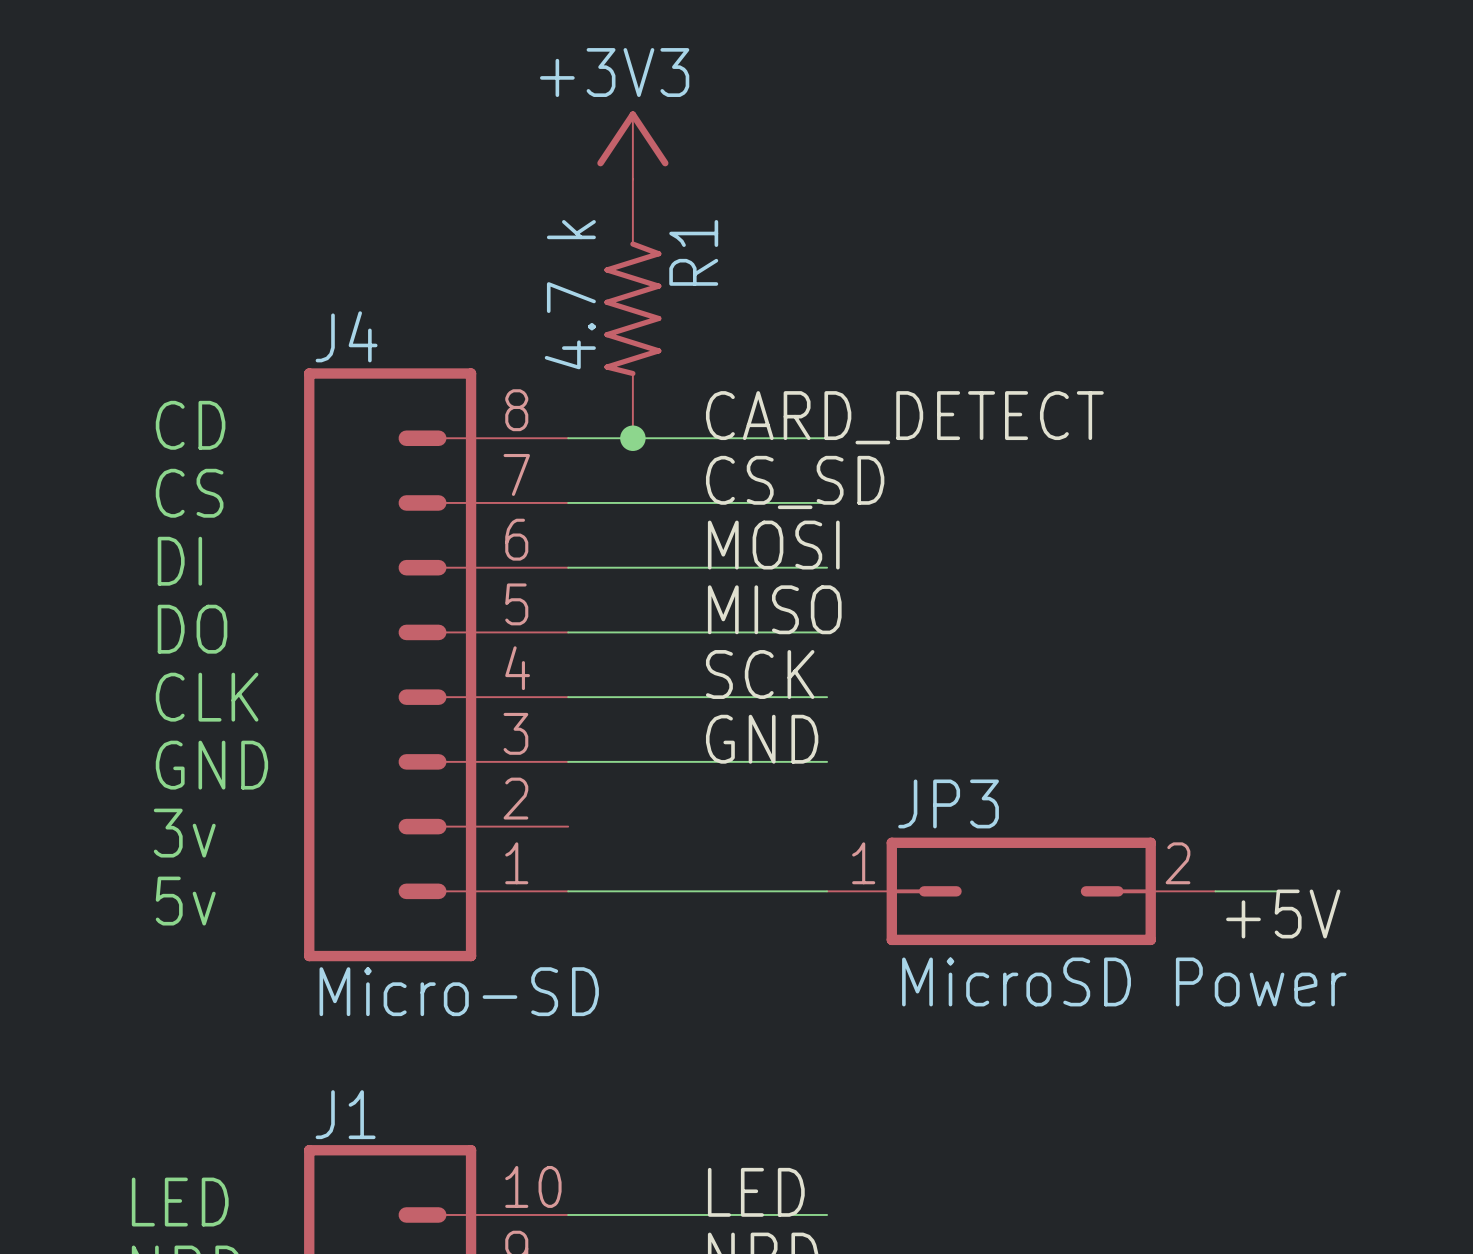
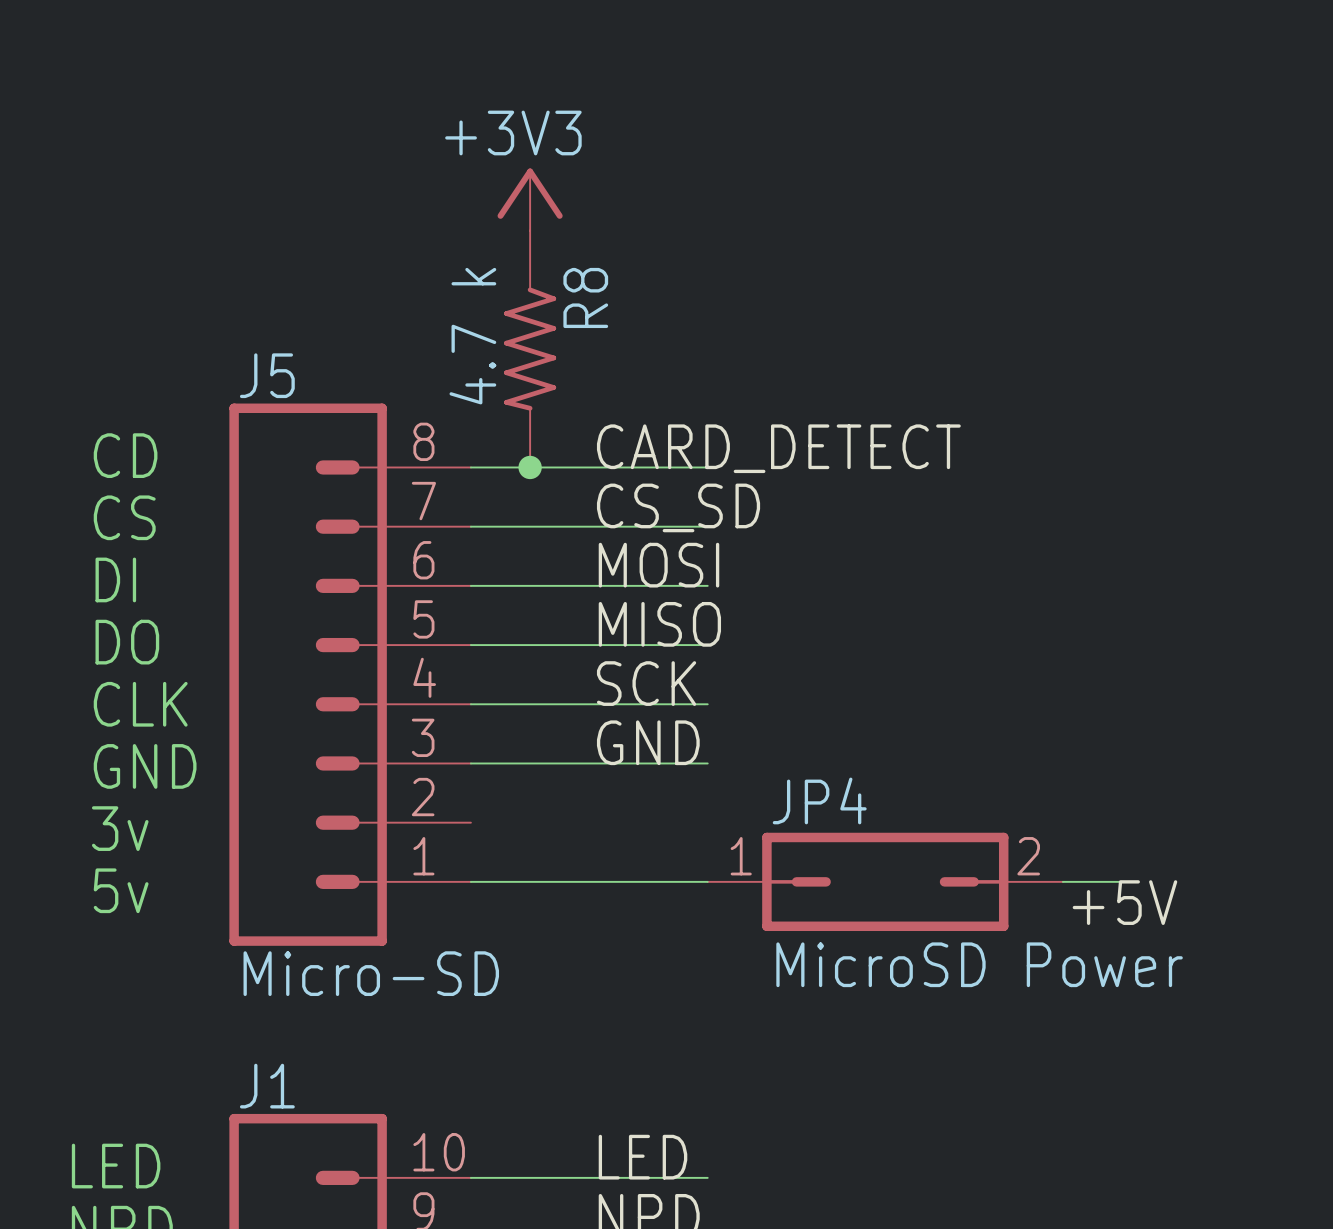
R1 name: R1 (693, 252) -> R8 (585, 297)
J4 name: J4 (346, 336) -> J5 (267, 375)
JP3 name: JP3 (948, 803) -> JP4 (819, 800)

